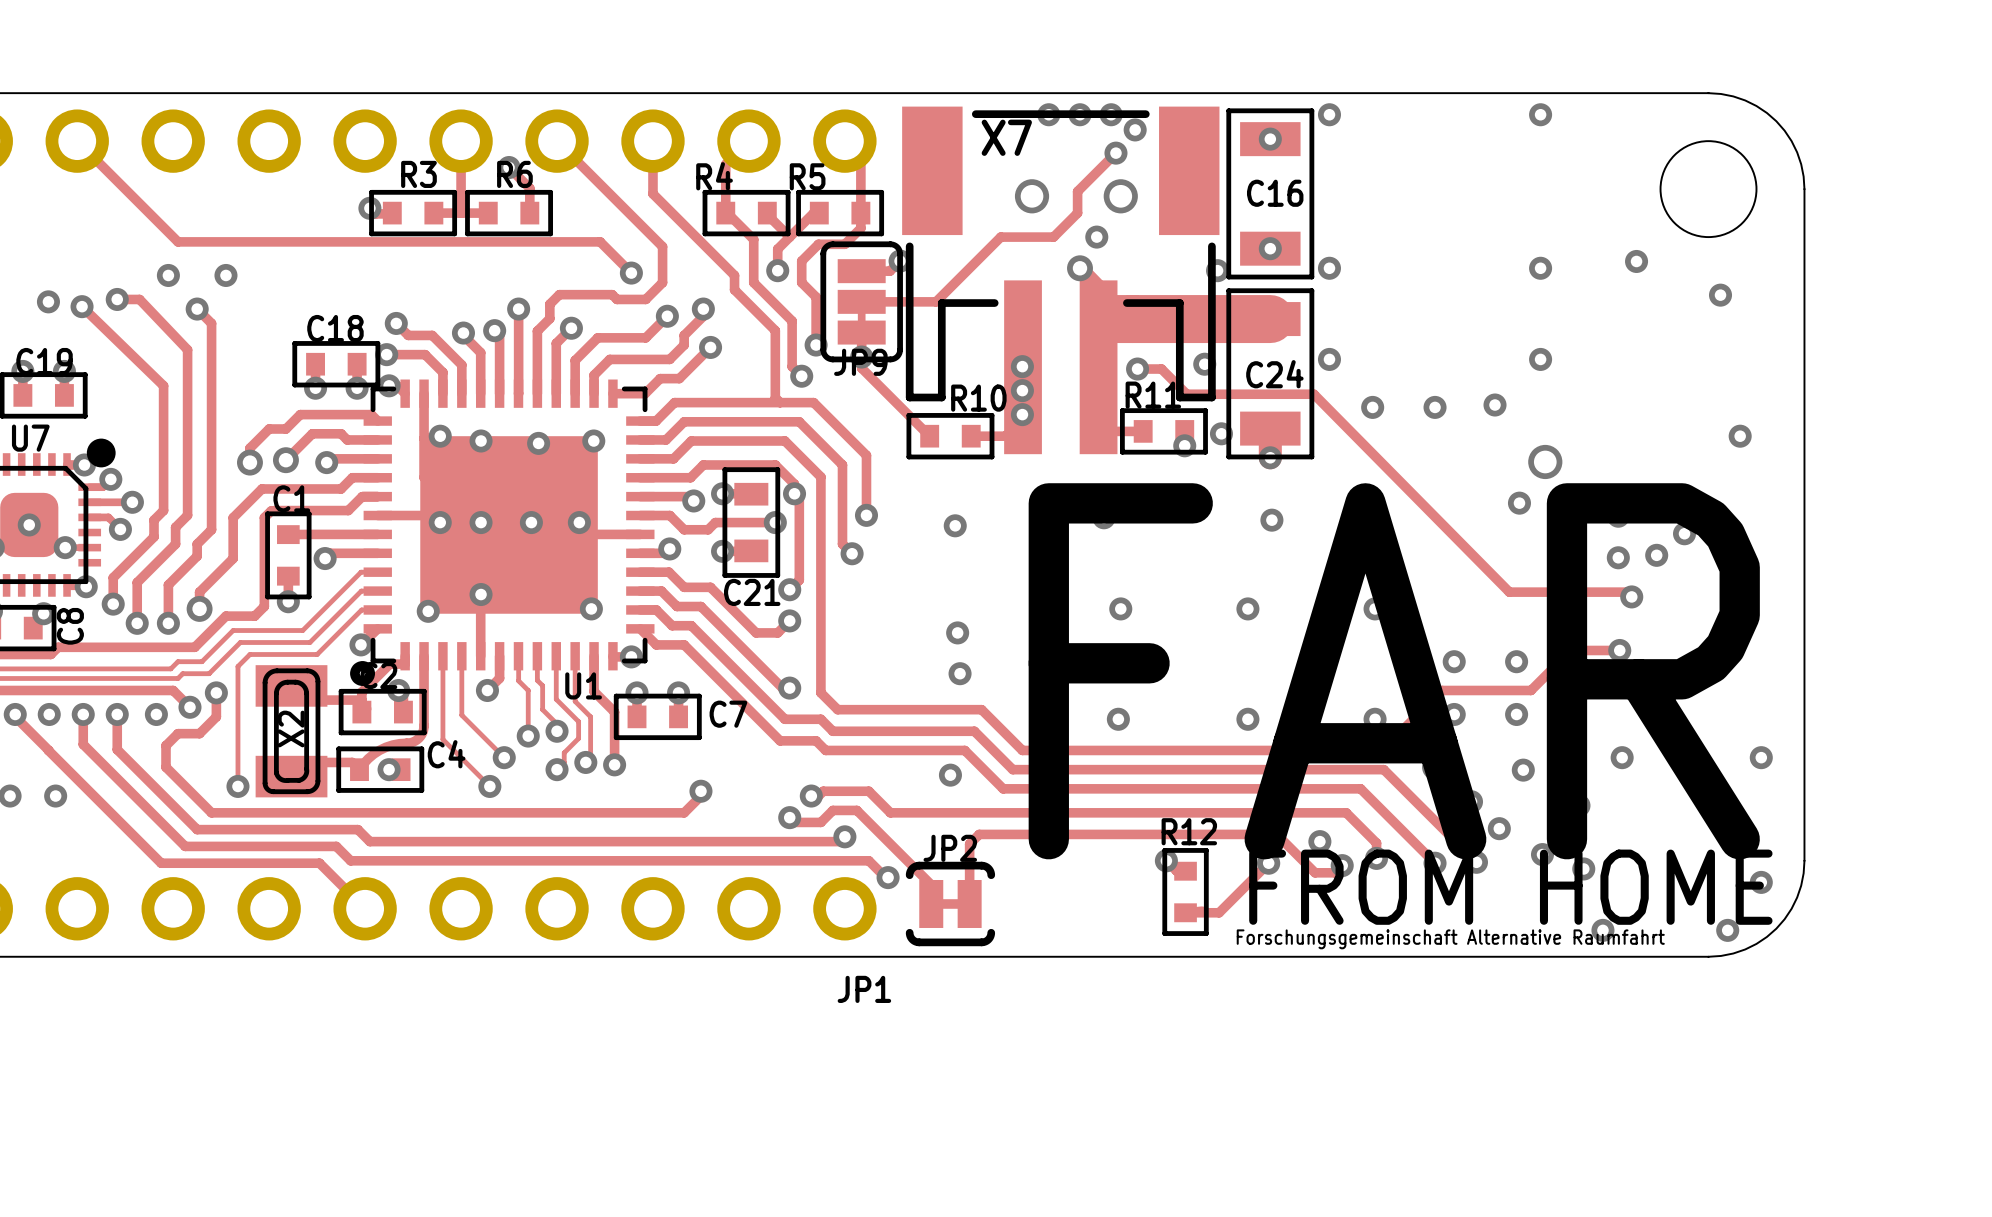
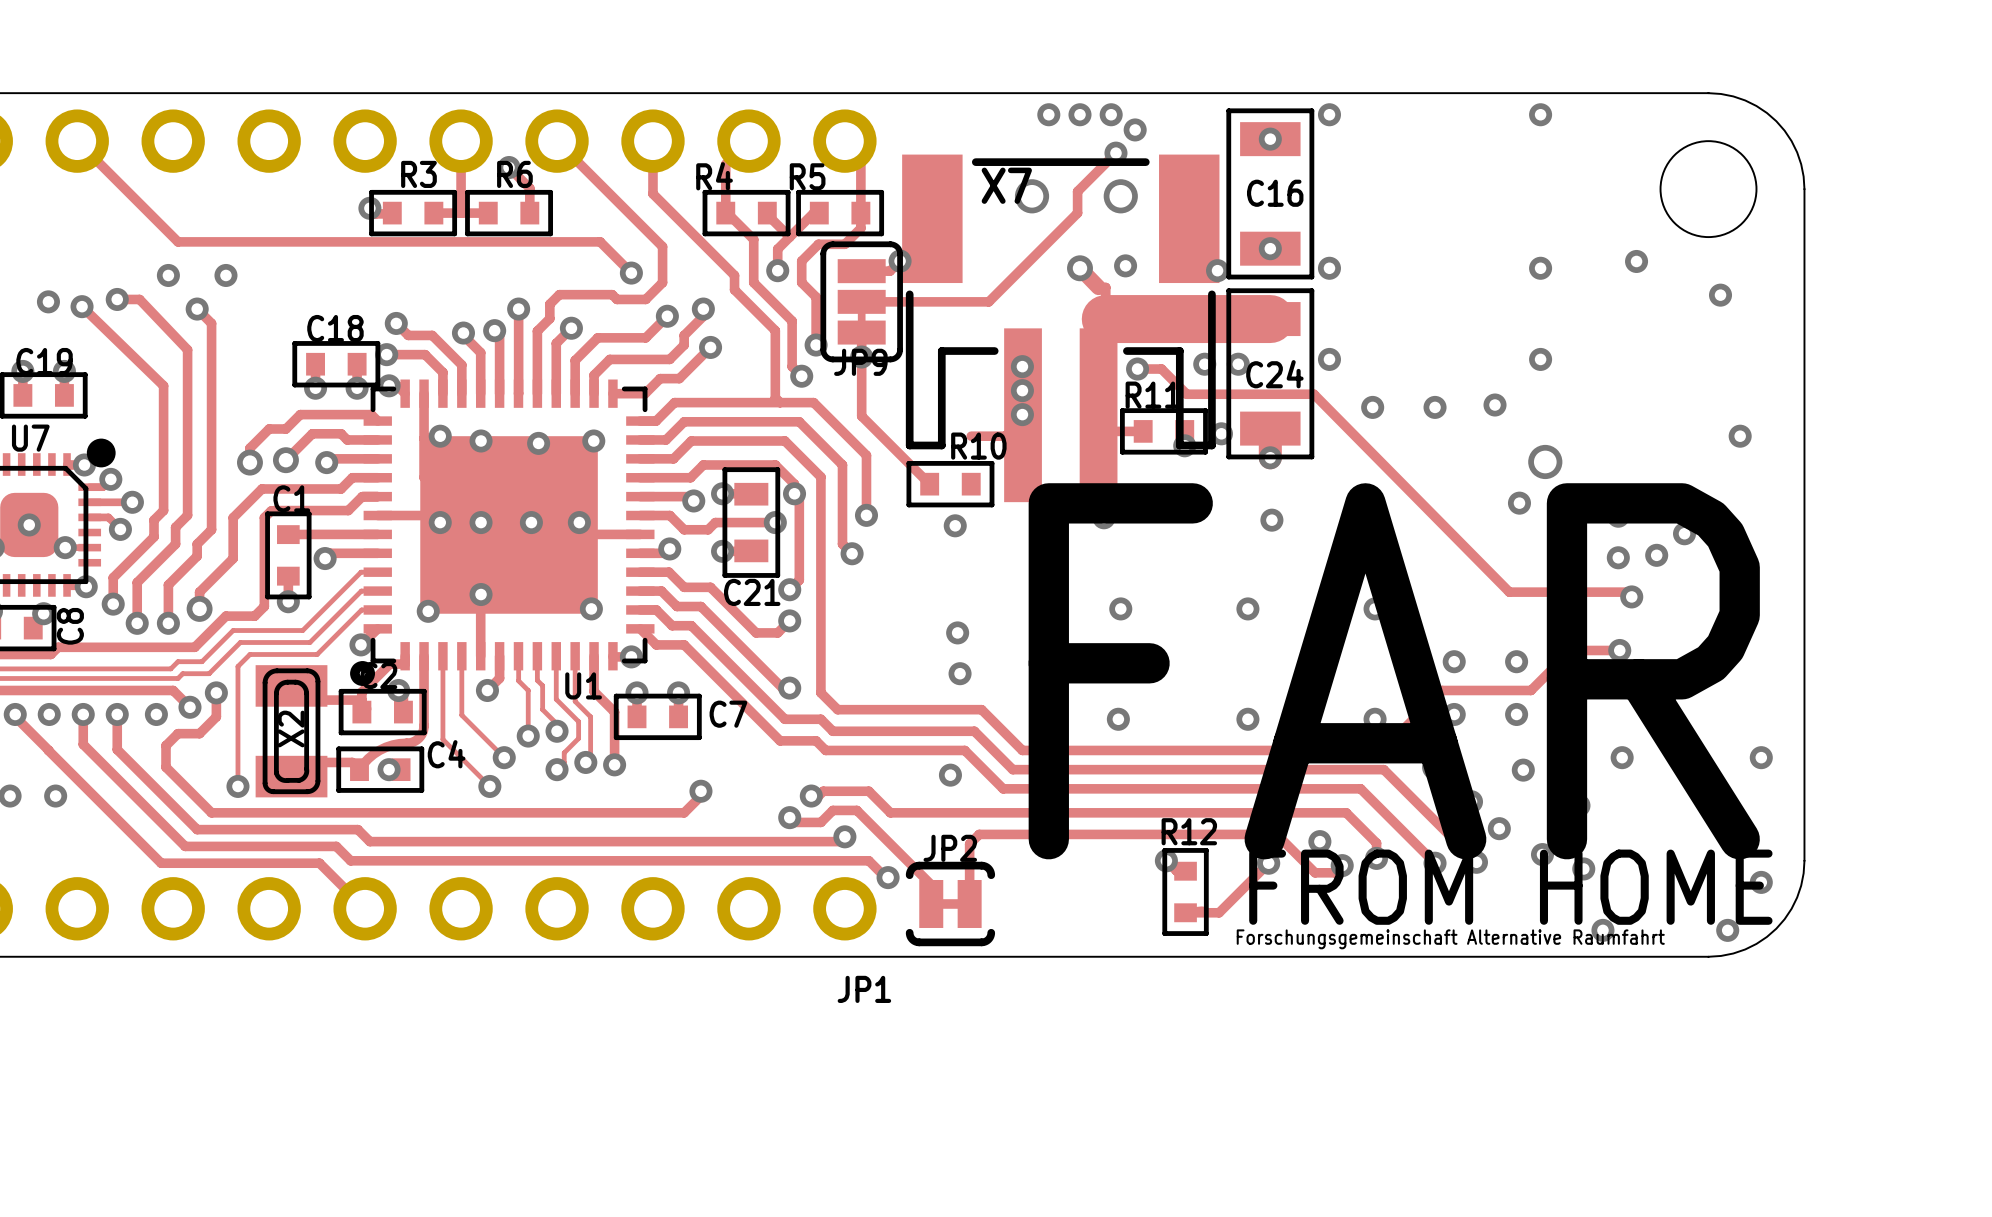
track: (1053, 237) (1000, 237) (936, 301) -> (1053, 237) (988, 301) (936, 301)
via position: (1096, 237) -> (1125, 265)
X7 position: (1060, 280) -> (1060, 328)
via: none -> (1238, 364)
track: (861, 368) (929, 436) -> (861, 368) (861, 416) (929, 484)
R10 position: (950, 436) -> (950, 484)

